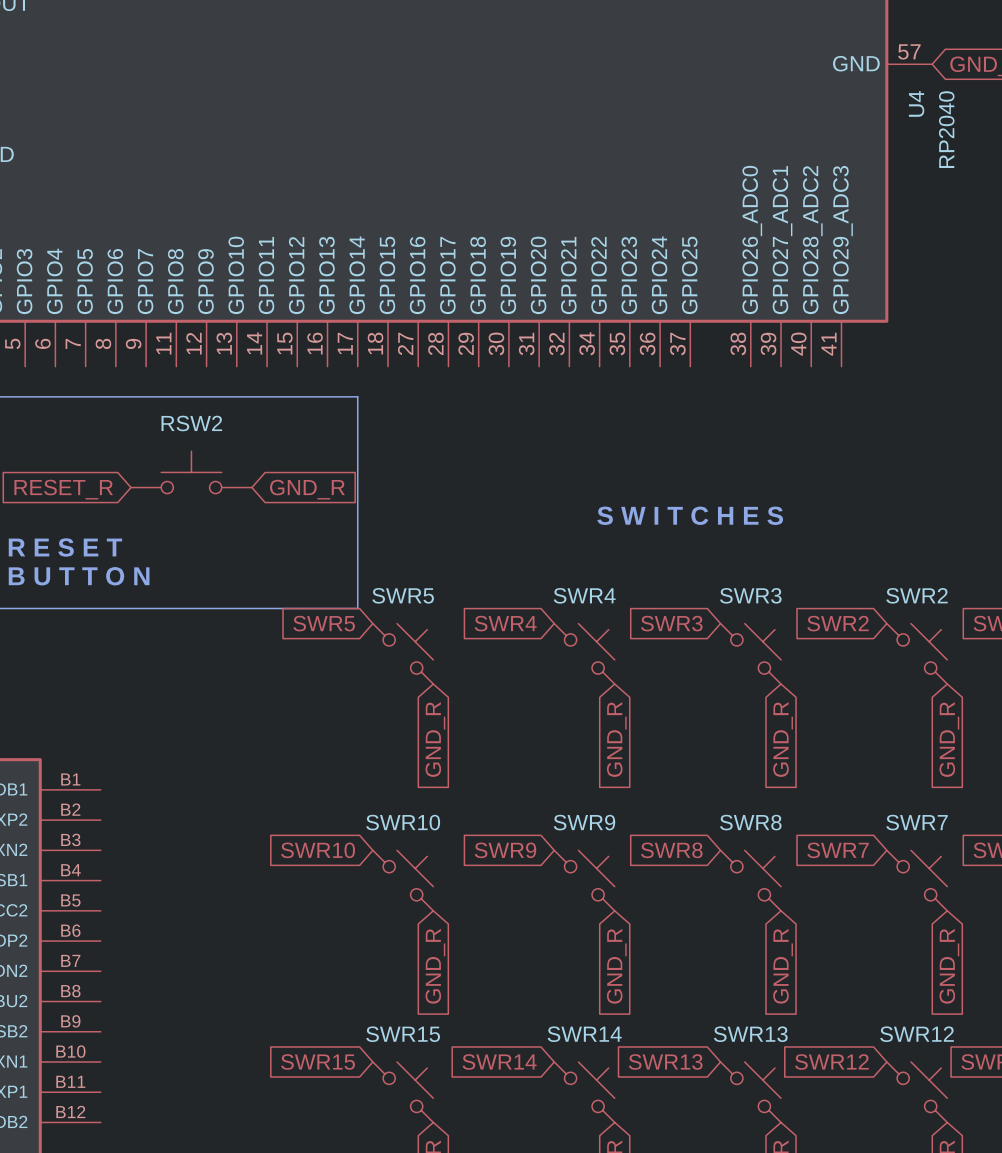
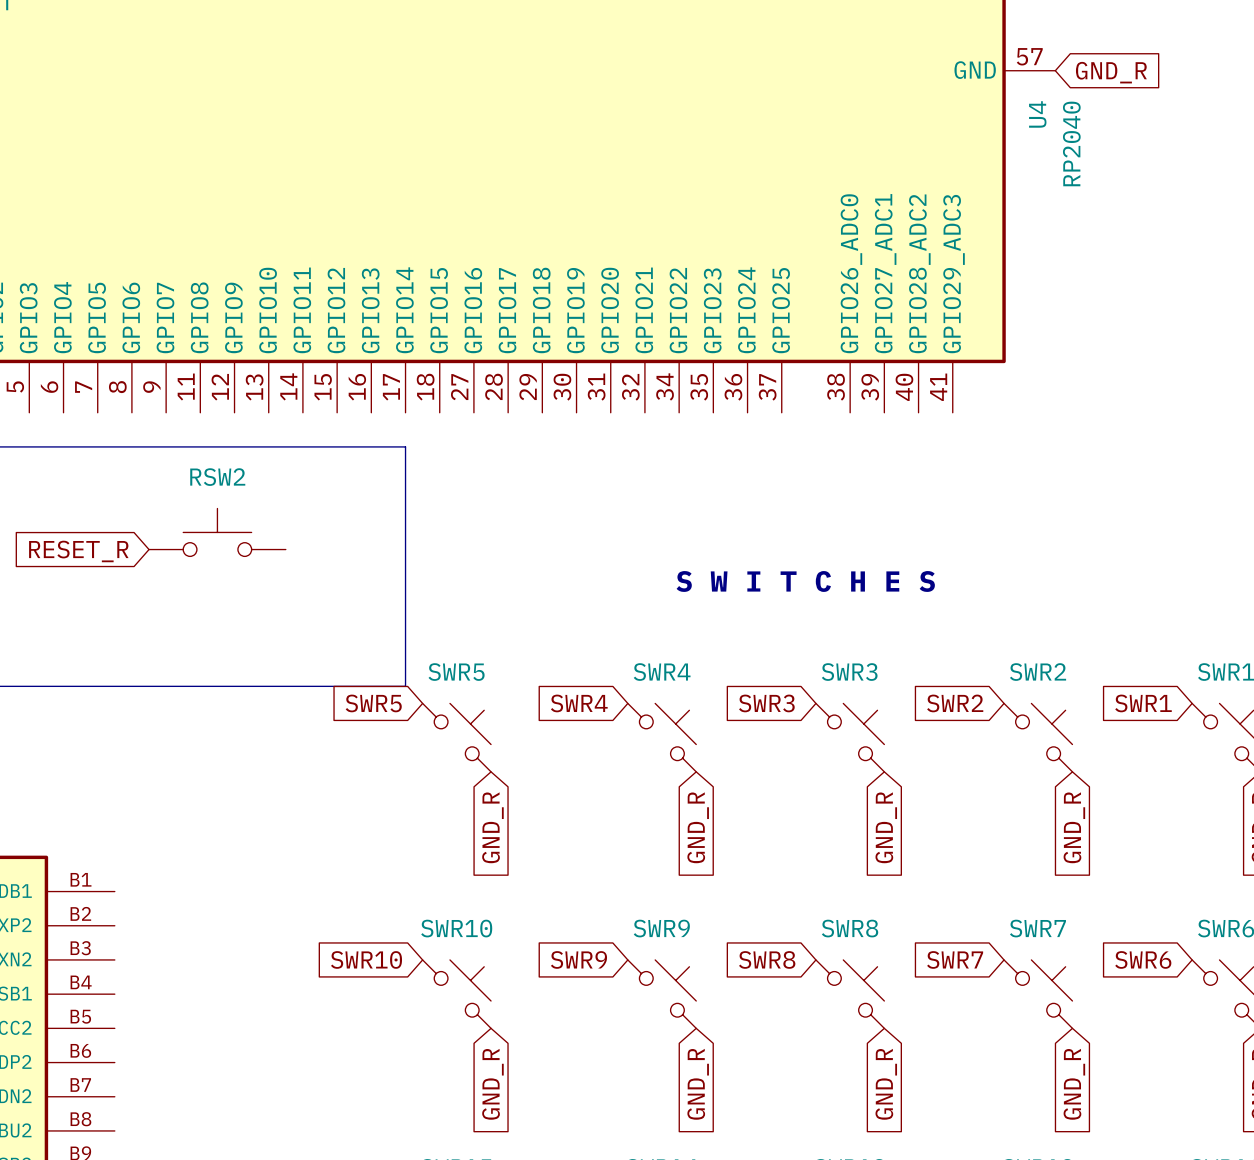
global label: GND_R (307, 489) -> none
text: R E S E T (65, 547) -> none
text: B U T T O N (79, 576) -> none

